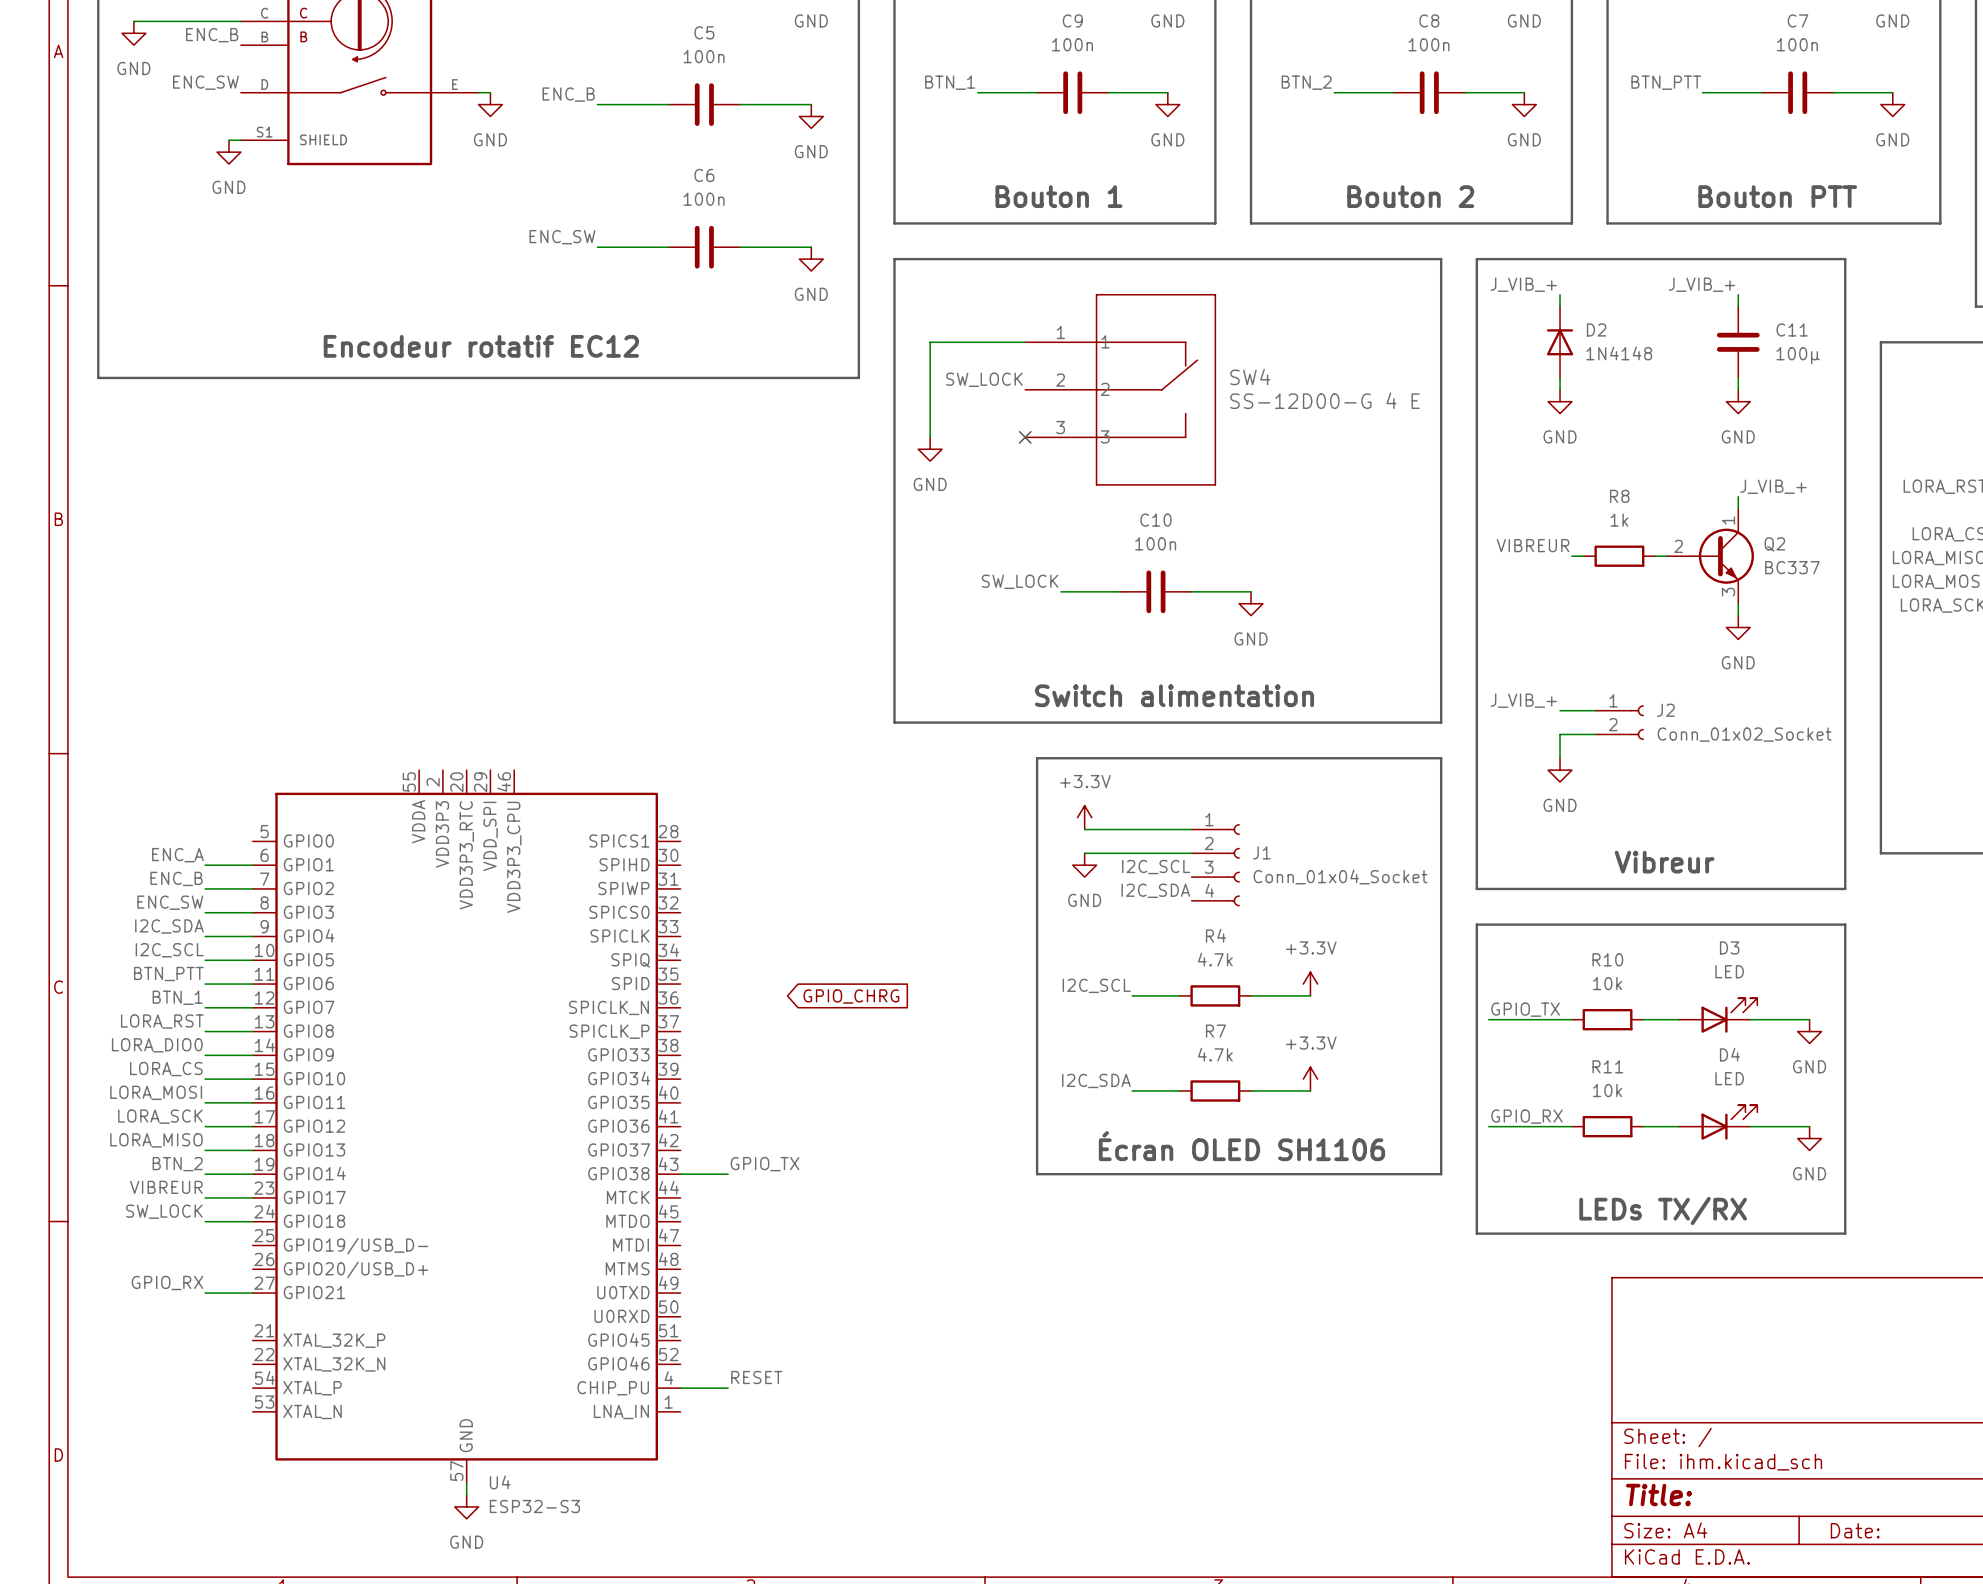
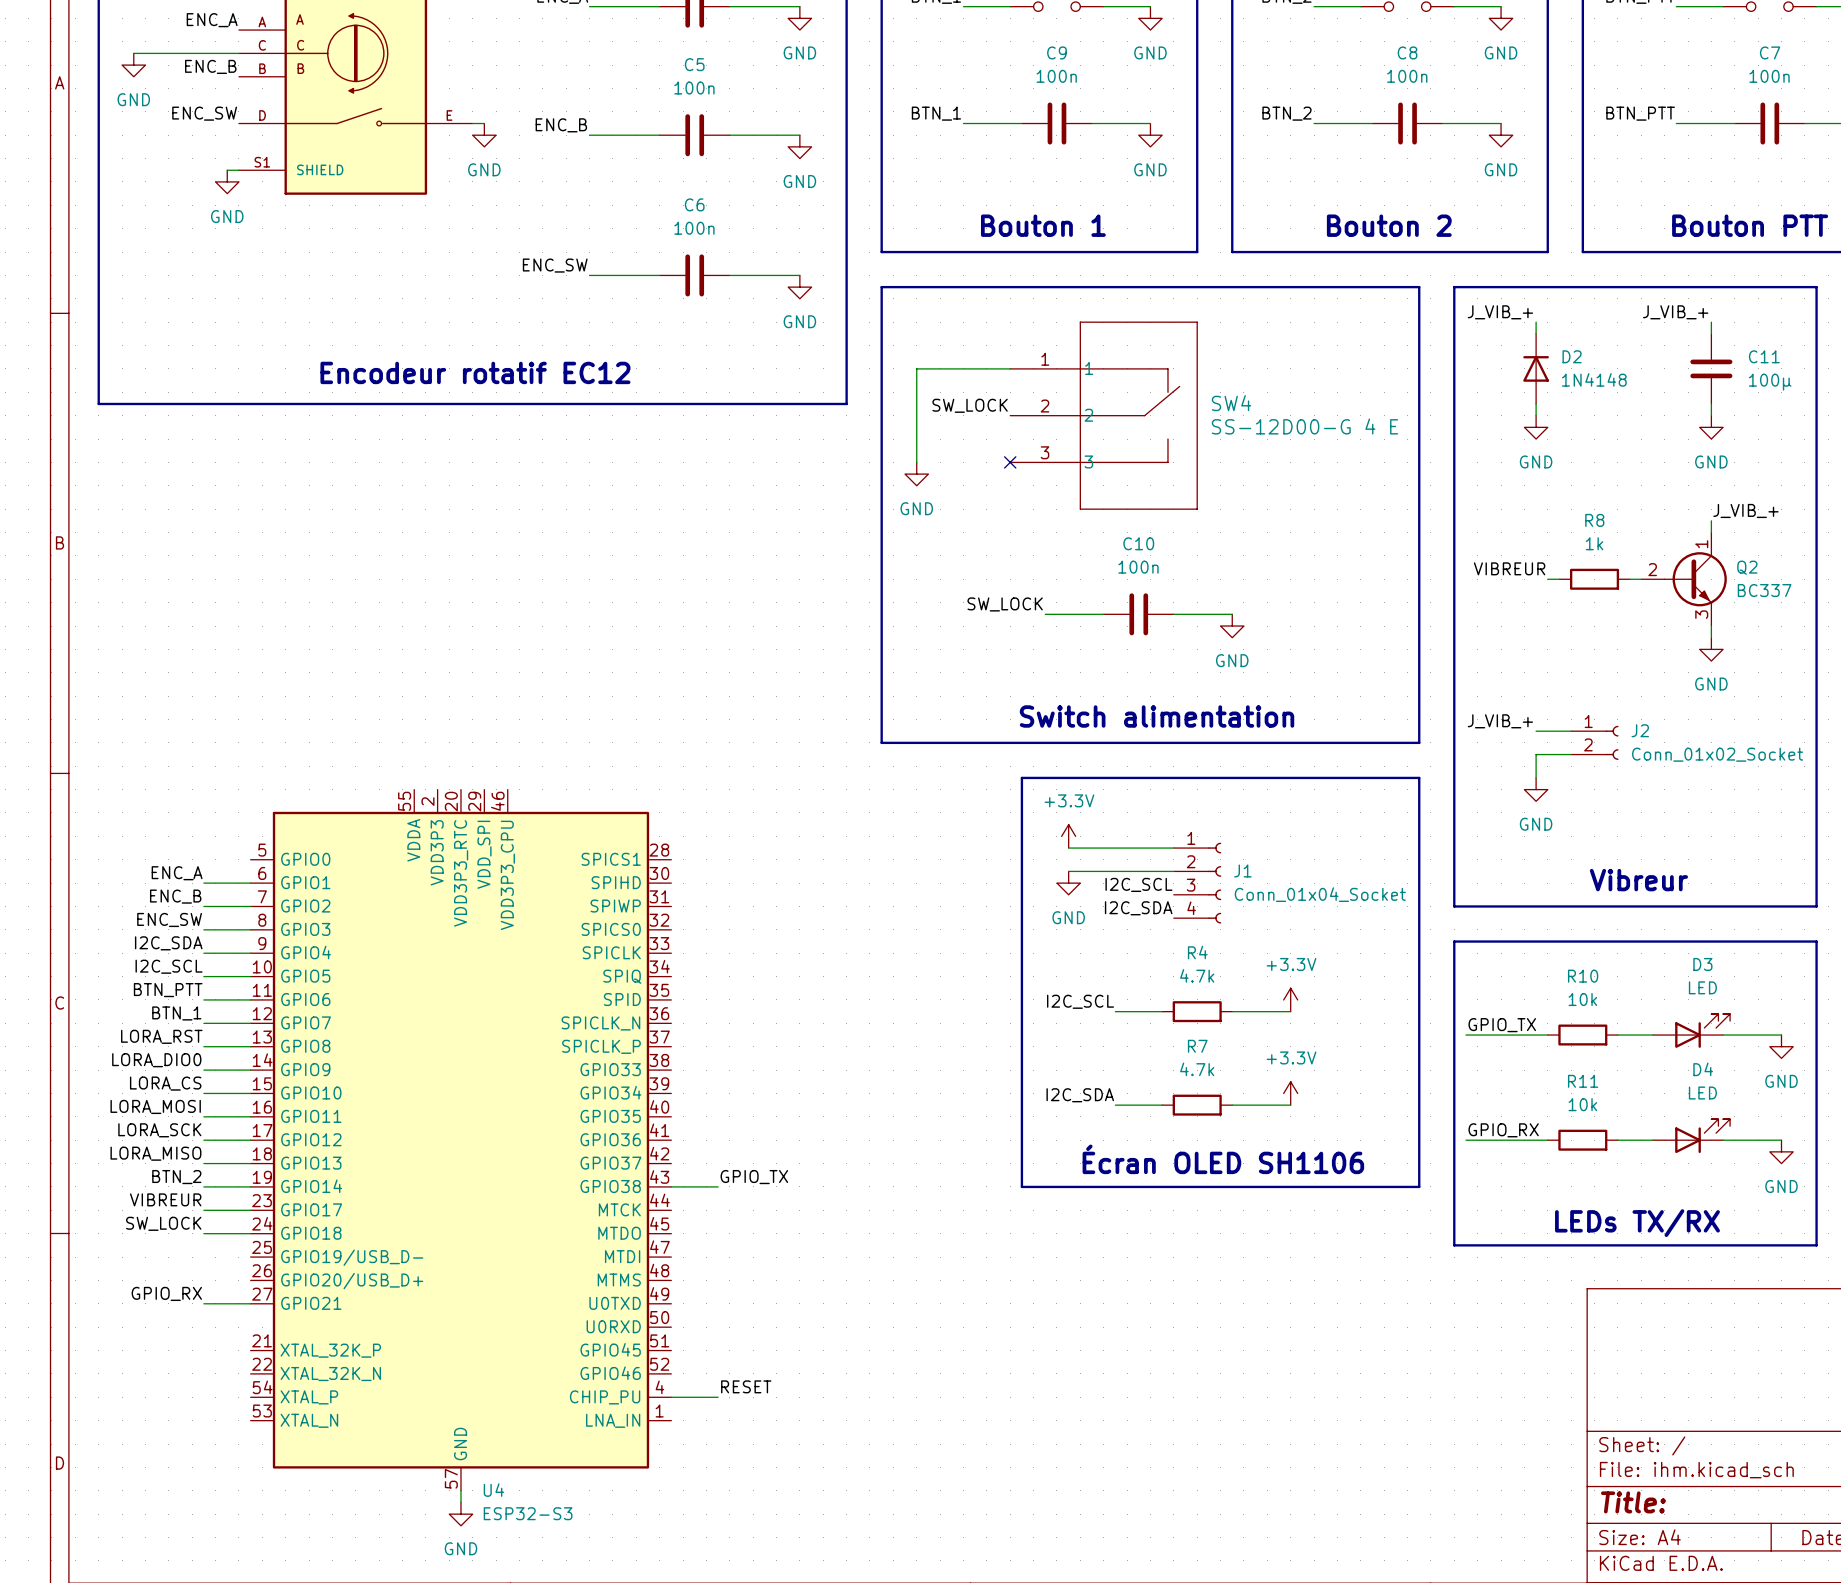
global label: GPIO_CHRG (851, 996) -> none

